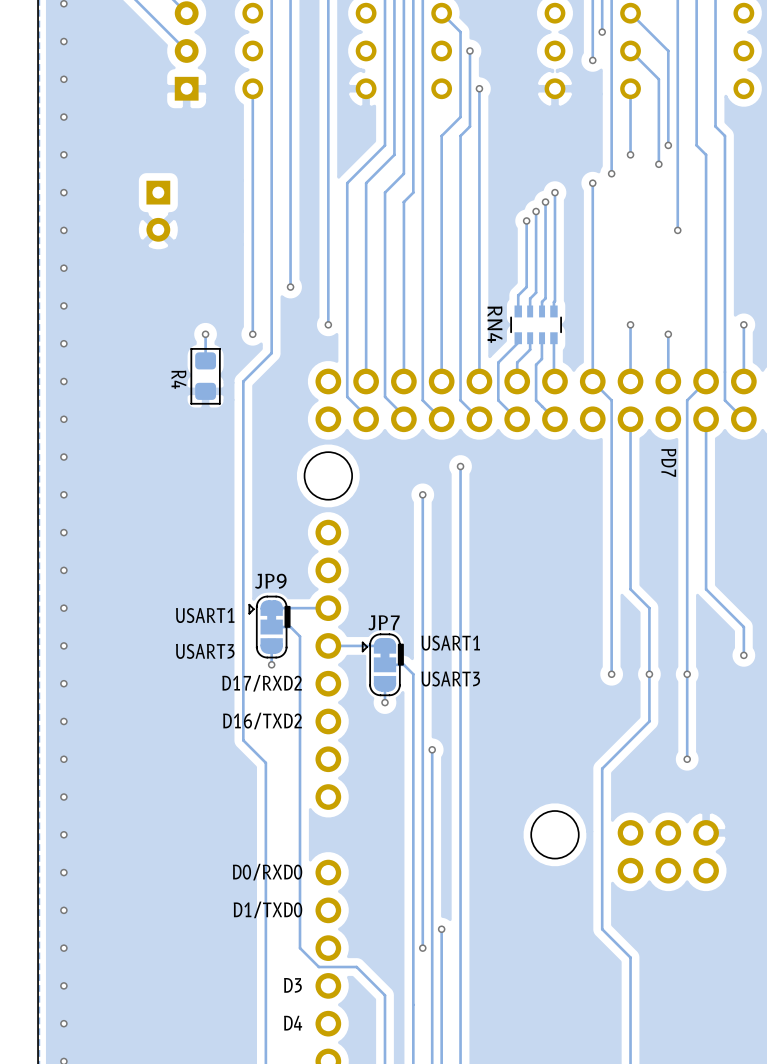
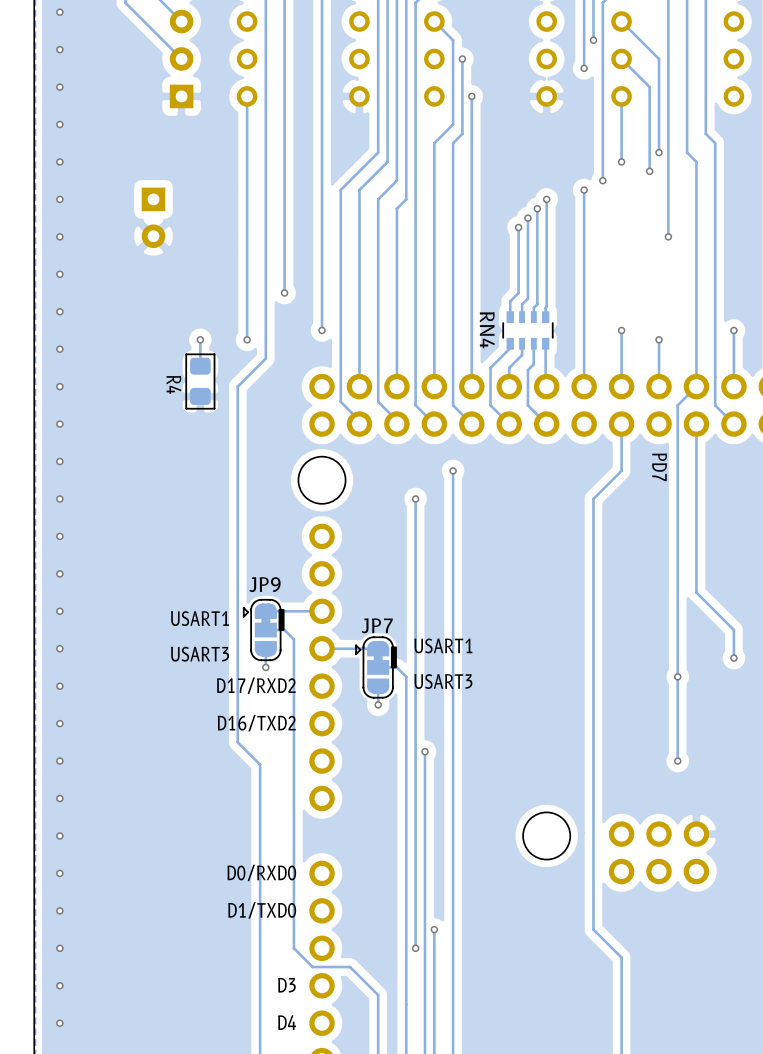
track: (592, 381) (611, 400) (611, 674) -> none
track: (630, 466) (630, 589) (649, 608) (649, 721) (602, 768) -> (621, 470) (593, 498) (593, 770)
via: (611, 674) -> none
via: (649, 674) -> none

